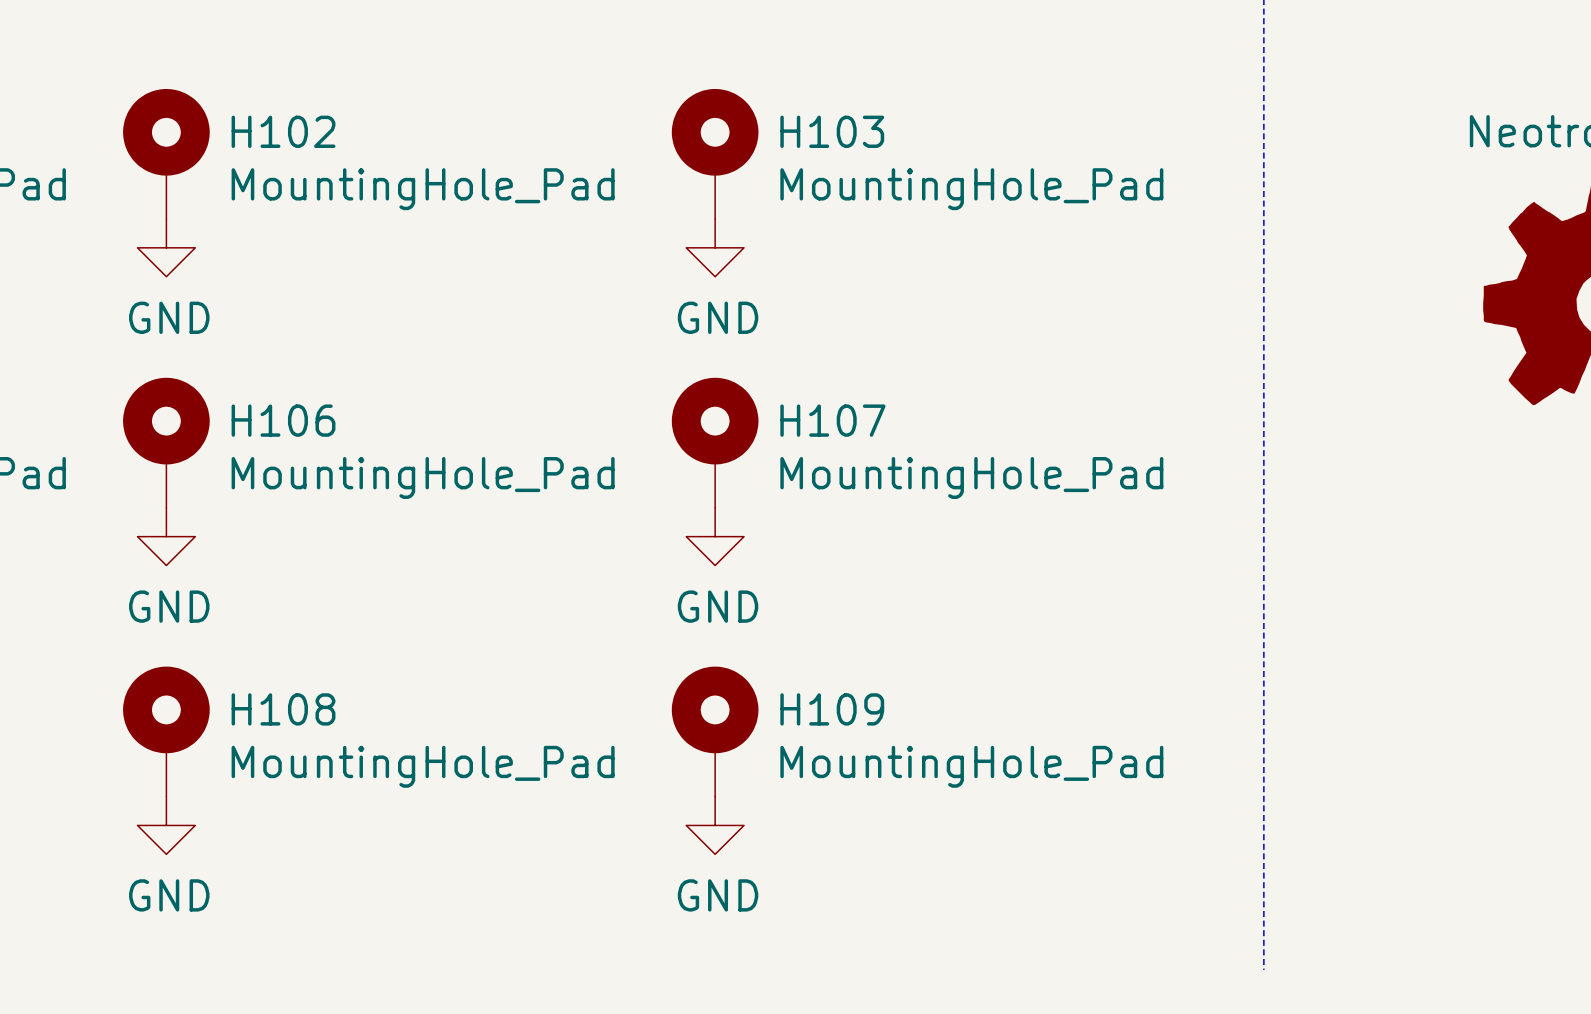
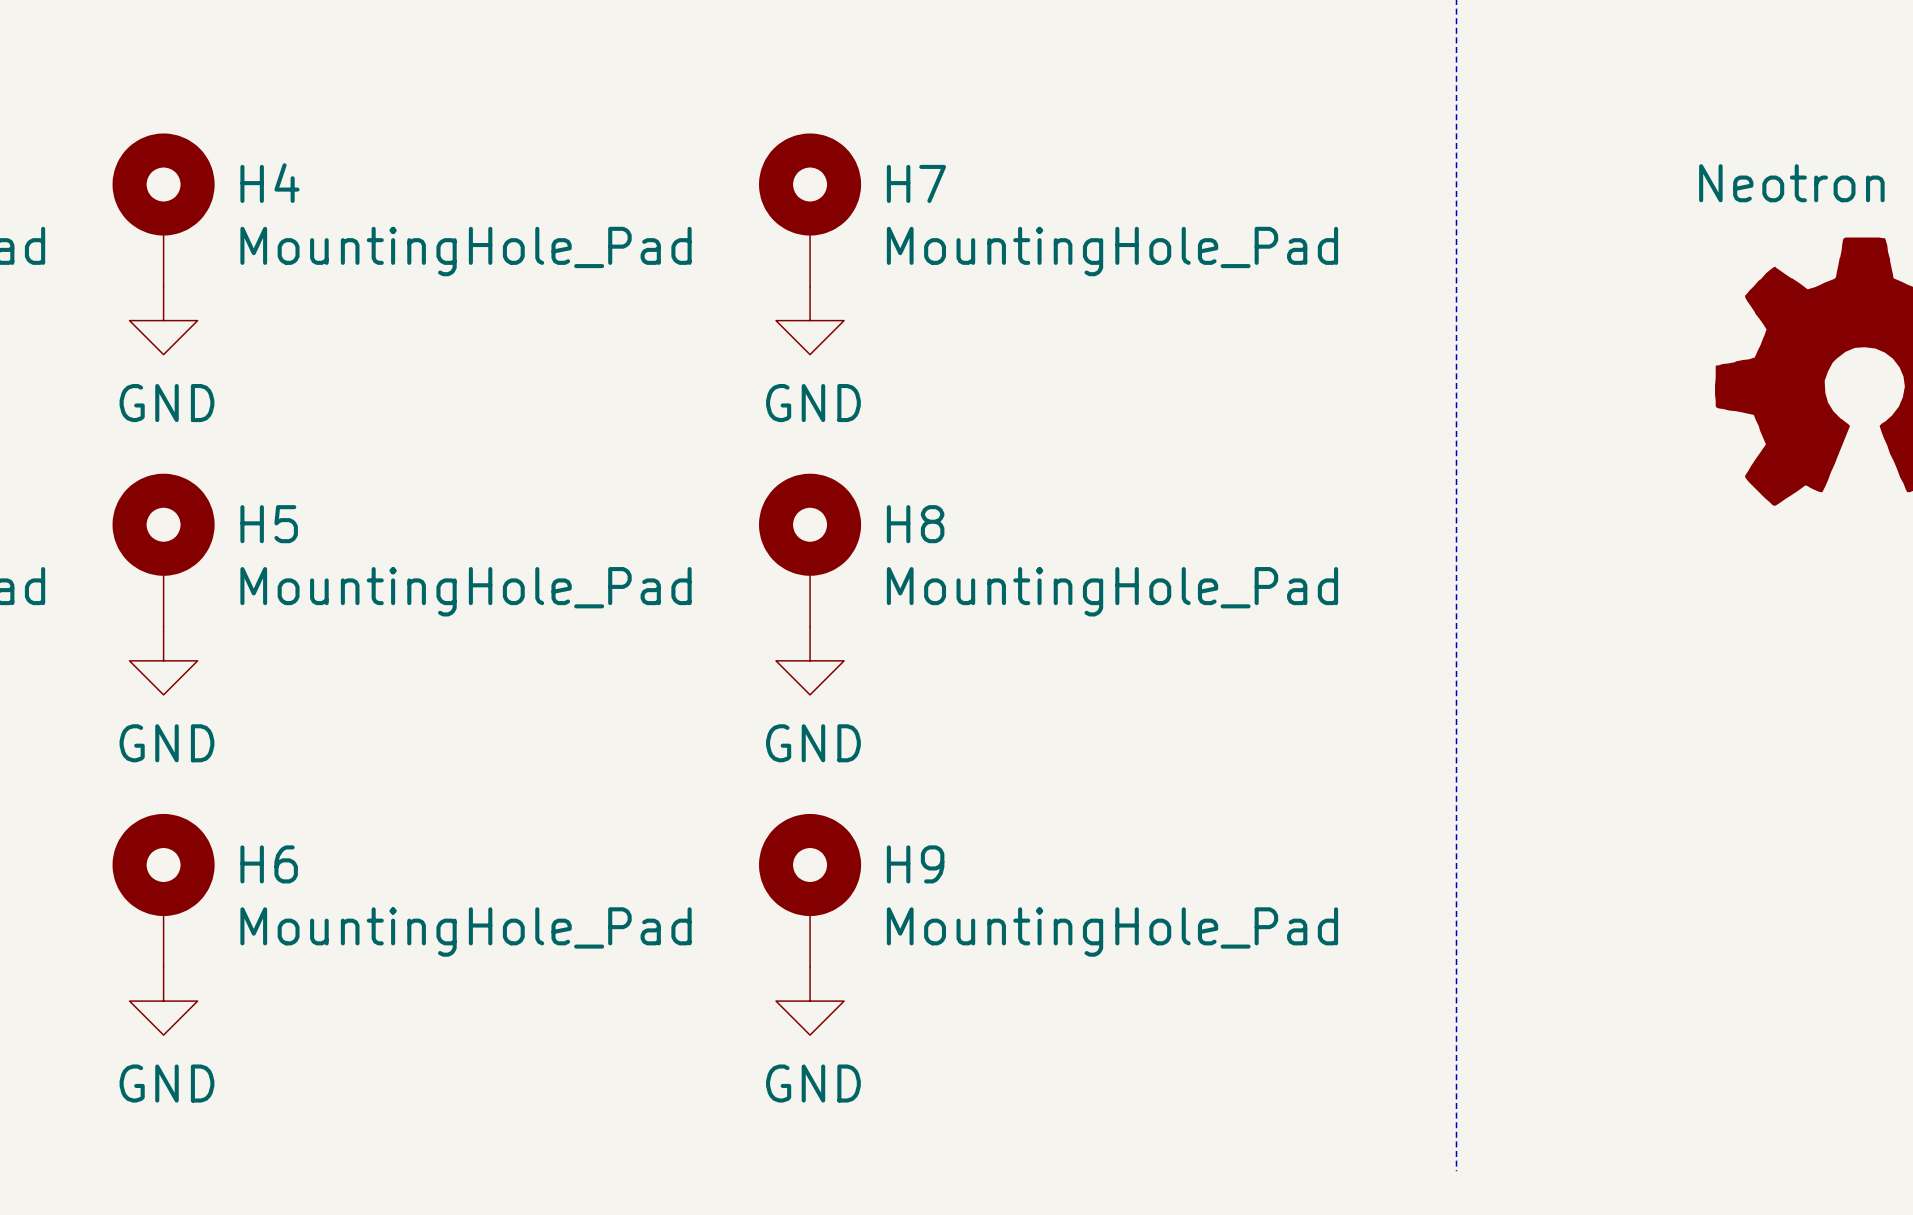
H102 name: H102 (283, 131) -> H4 (269, 183)
H103 name: H103 (832, 131) -> H7 (916, 183)
H106 name: H106 (283, 420) -> H5 (269, 524)
H107 name: H107 (832, 420) -> H8 (915, 524)
H108 name: H108 (283, 709) -> H6 (269, 864)
H109 name: H109 (832, 709) -> H9 (915, 864)

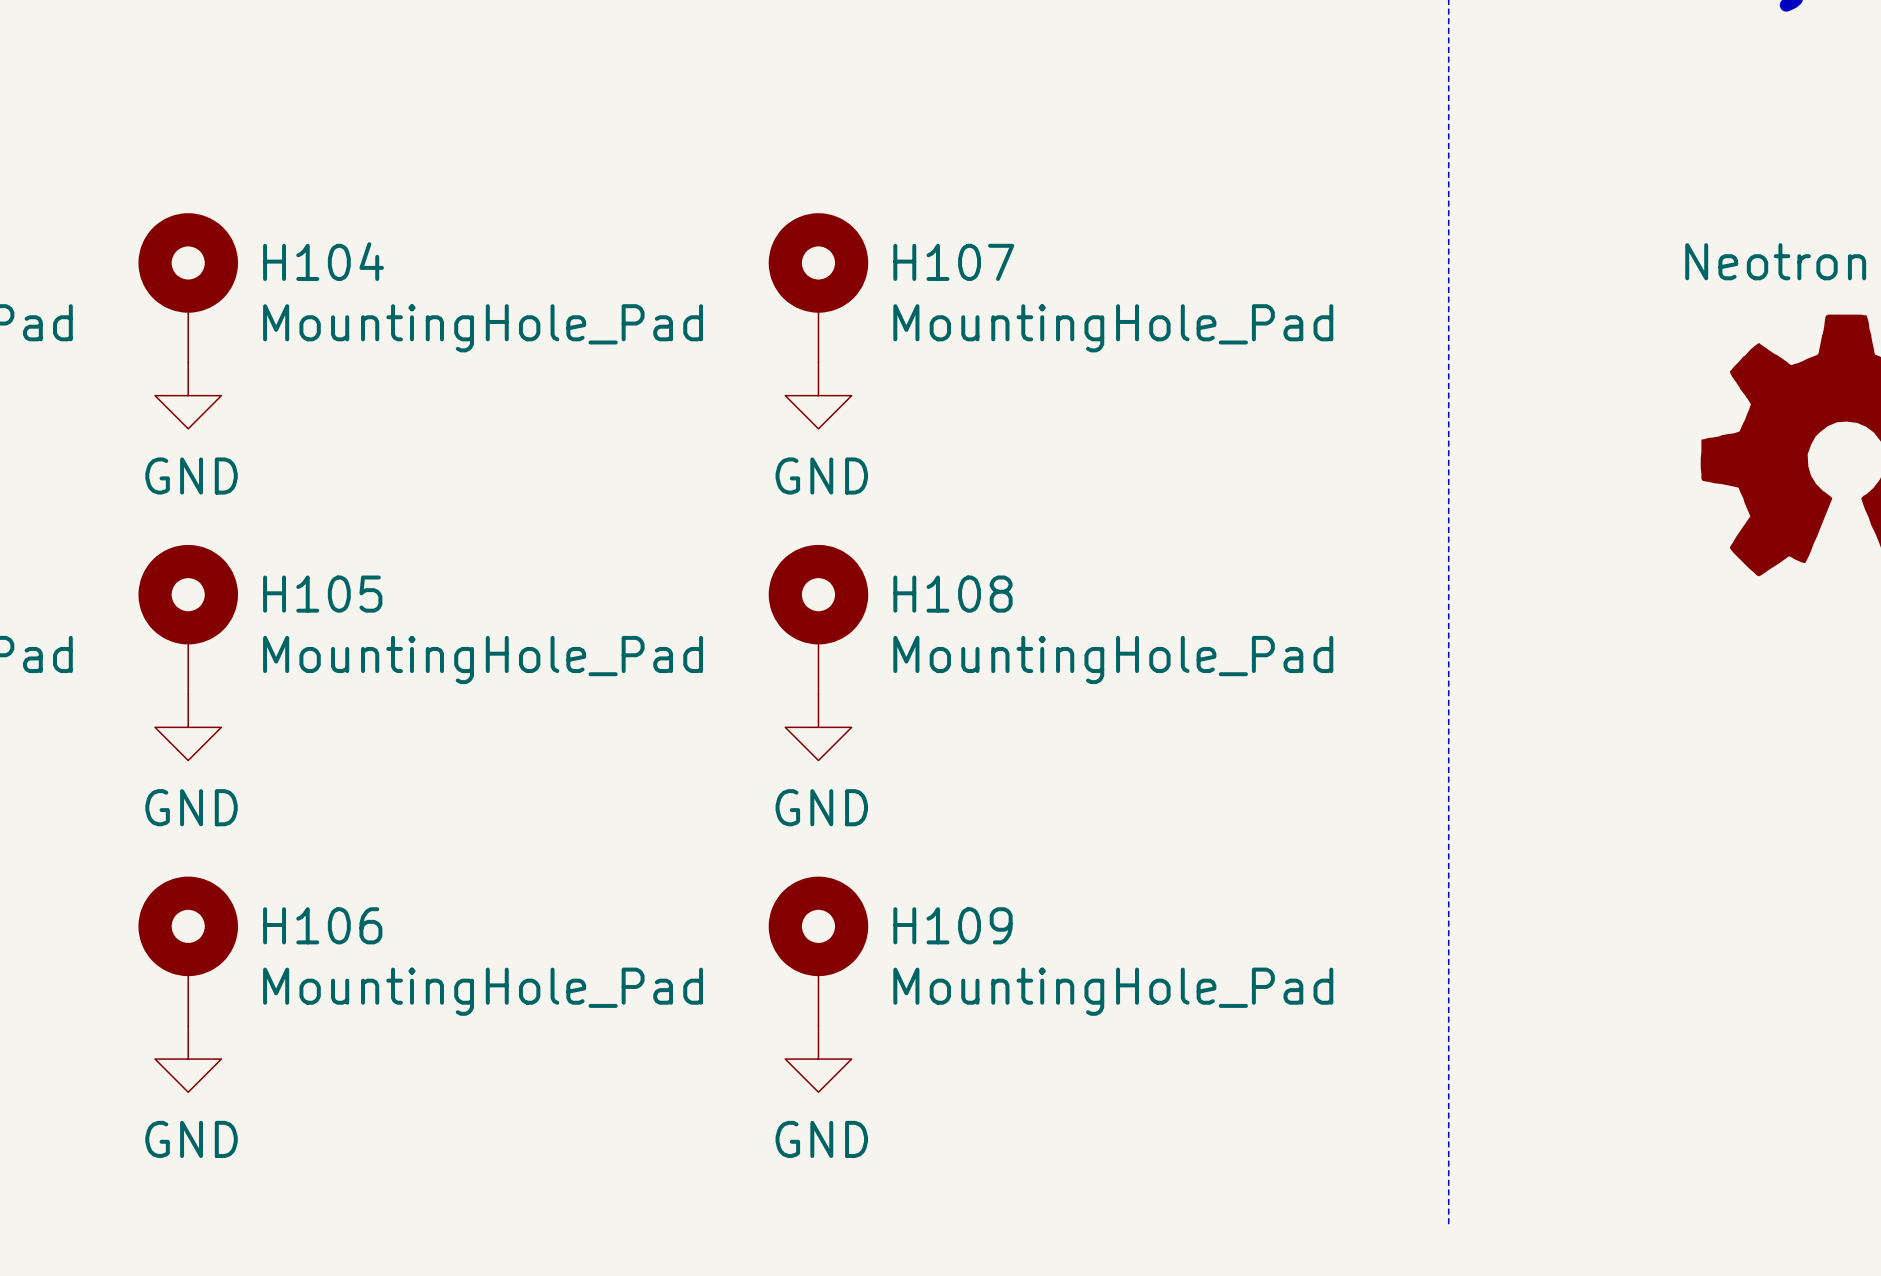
H4 name: H4 (269, 183) -> H104 (323, 261)
H7 name: H7 (916, 183) -> H107 (953, 262)
H5 name: H5 (269, 524) -> H105 (322, 594)
H8 name: H8 (915, 524) -> H108 (952, 594)
H6 name: H6 (269, 864) -> H106 (322, 925)
H9 name: H9 (915, 864) -> H109 (952, 925)

